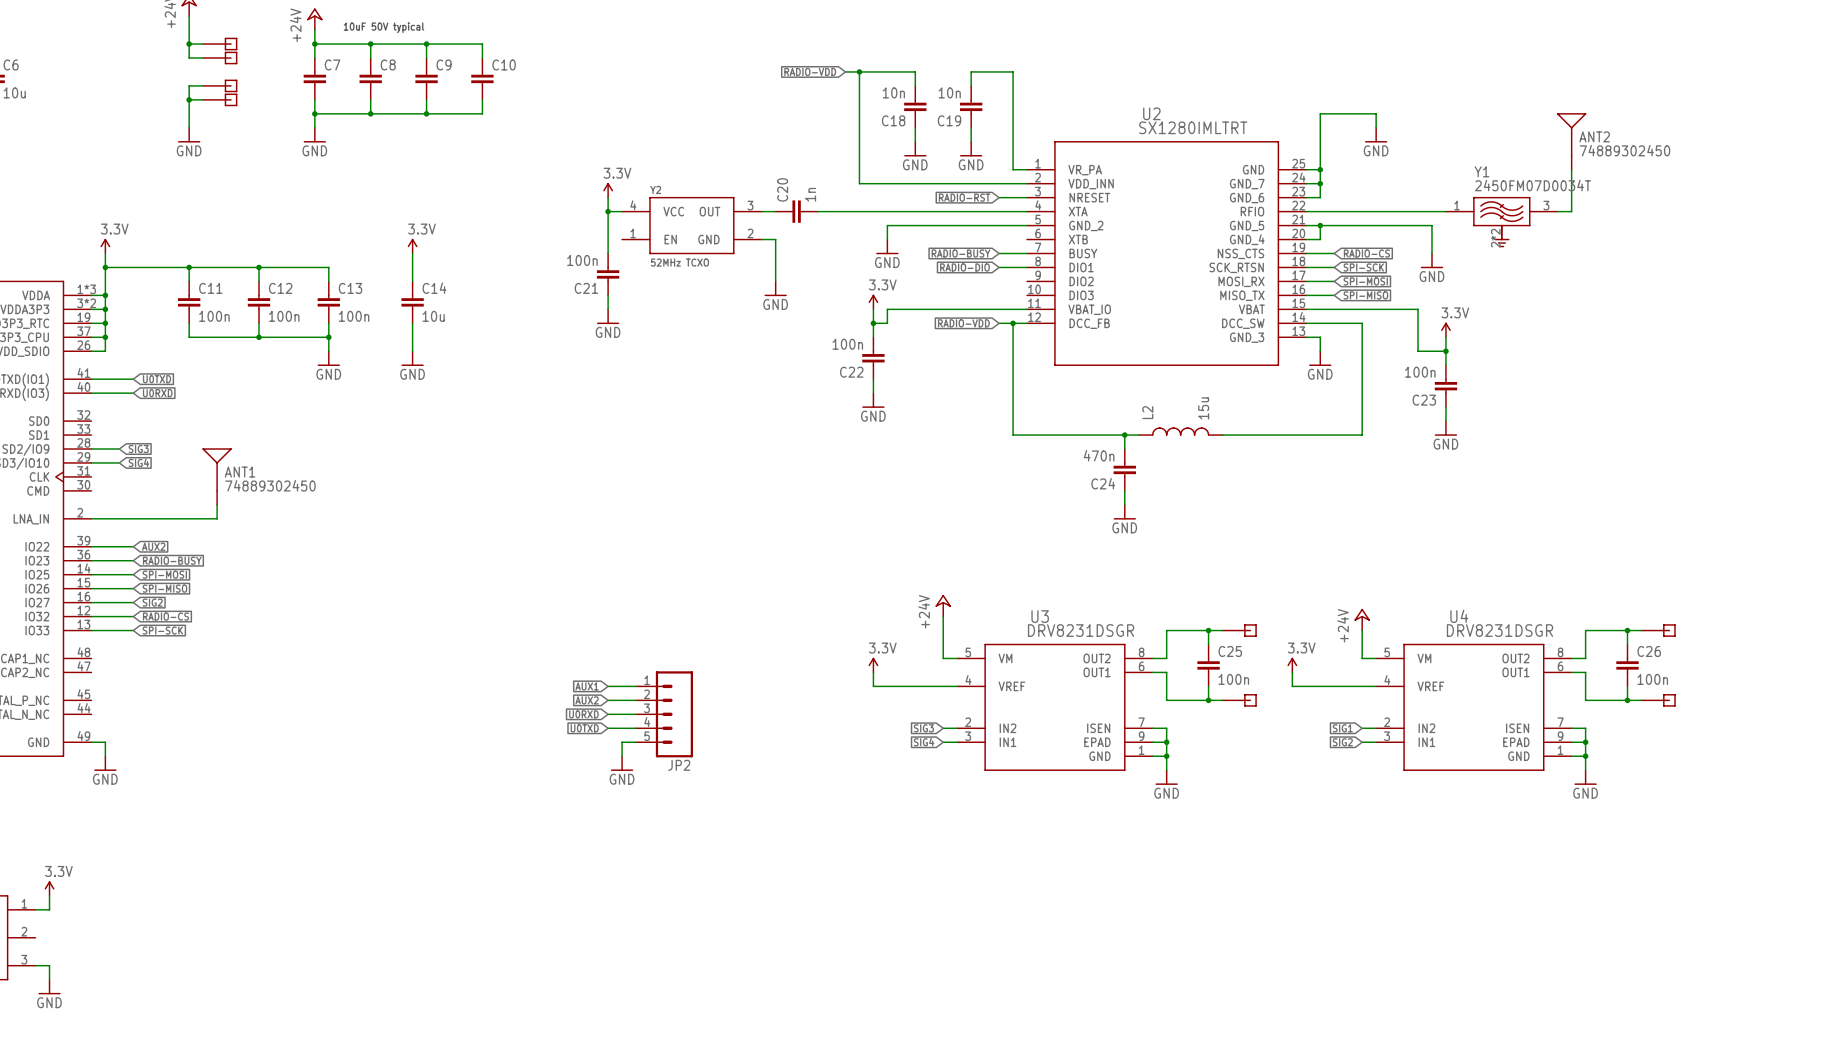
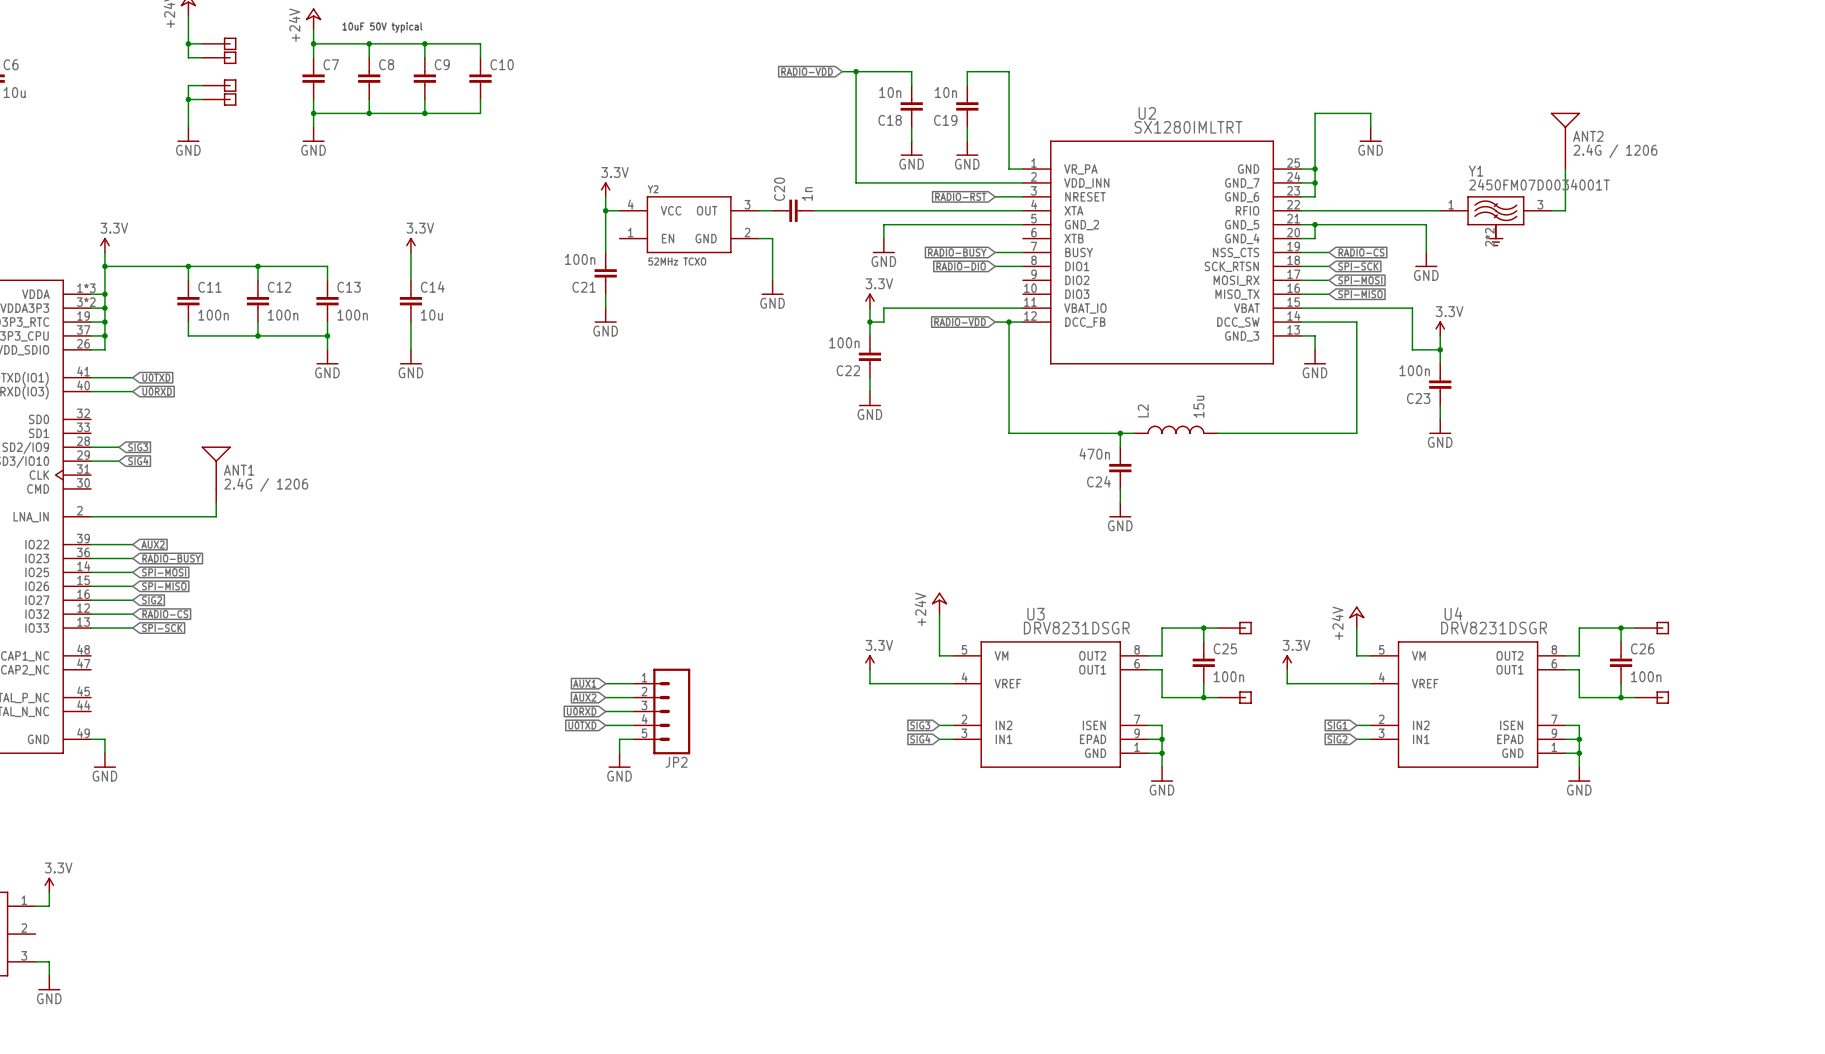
ANT2 value: 74889302450 (1625, 150) -> 2.4G / 1206 (1615, 151)
Y1 value: 2450FM07D0034T (1533, 185) -> 2450FM07D0034001T (1539, 184)
ANT1 value: 74889302450 (270, 485) -> 2.4G / 1206 (266, 485)

